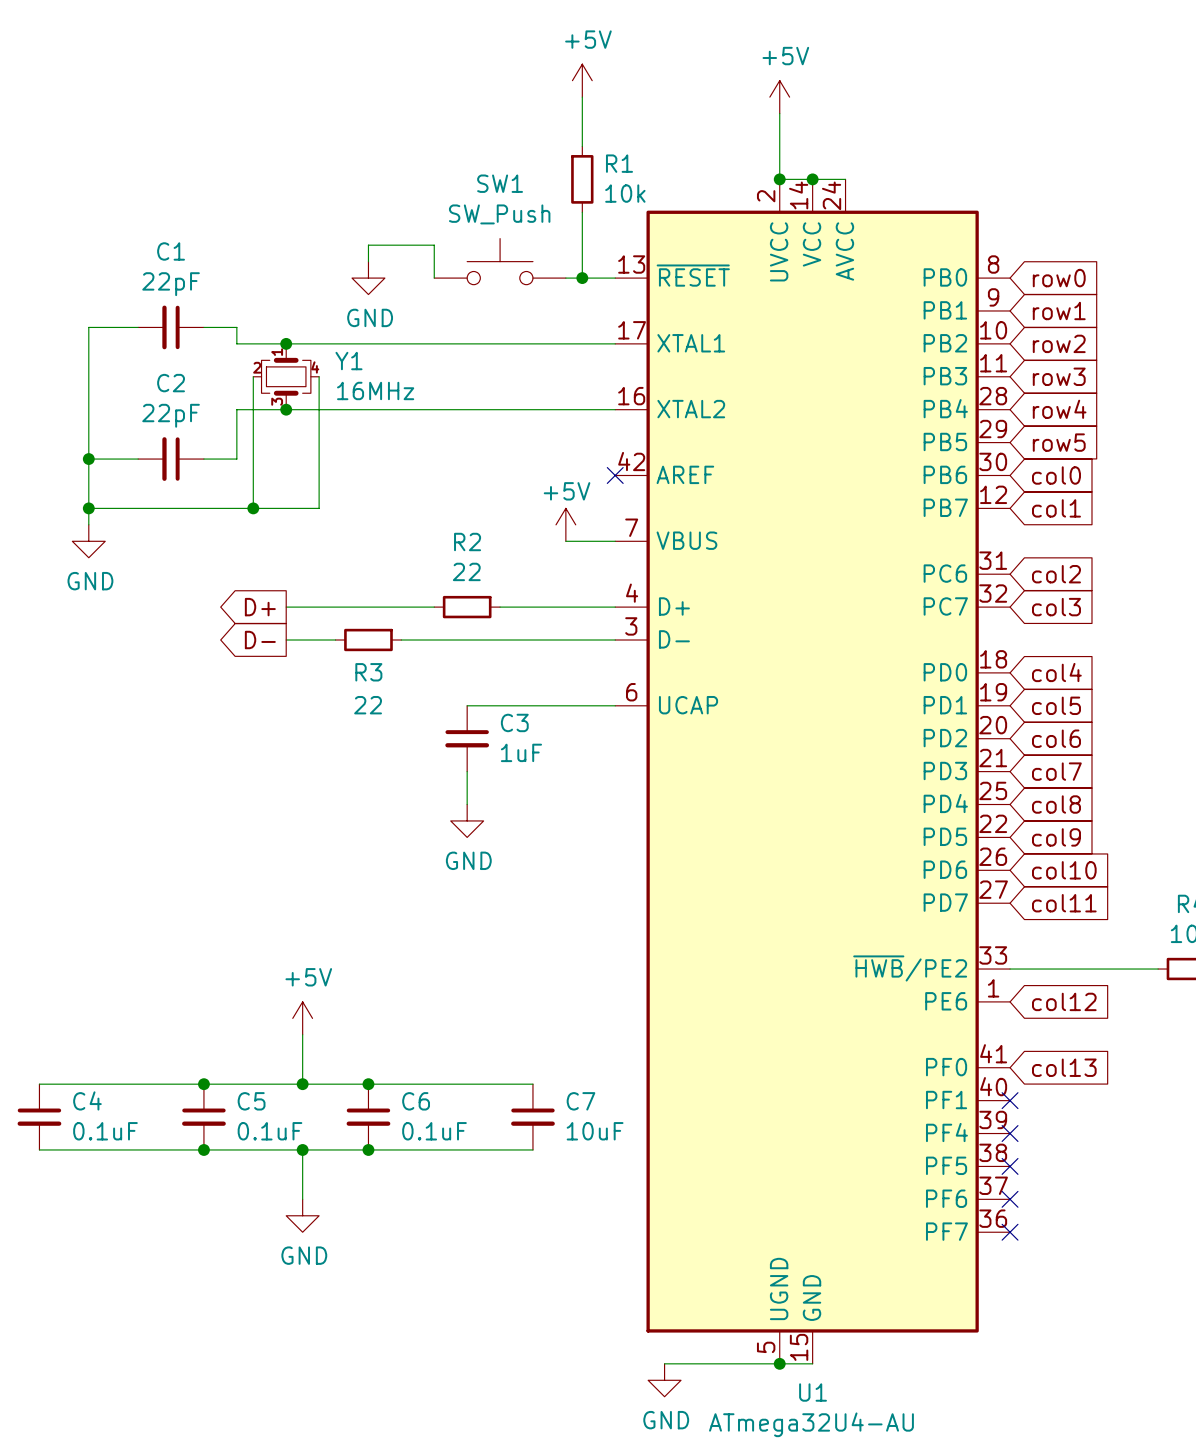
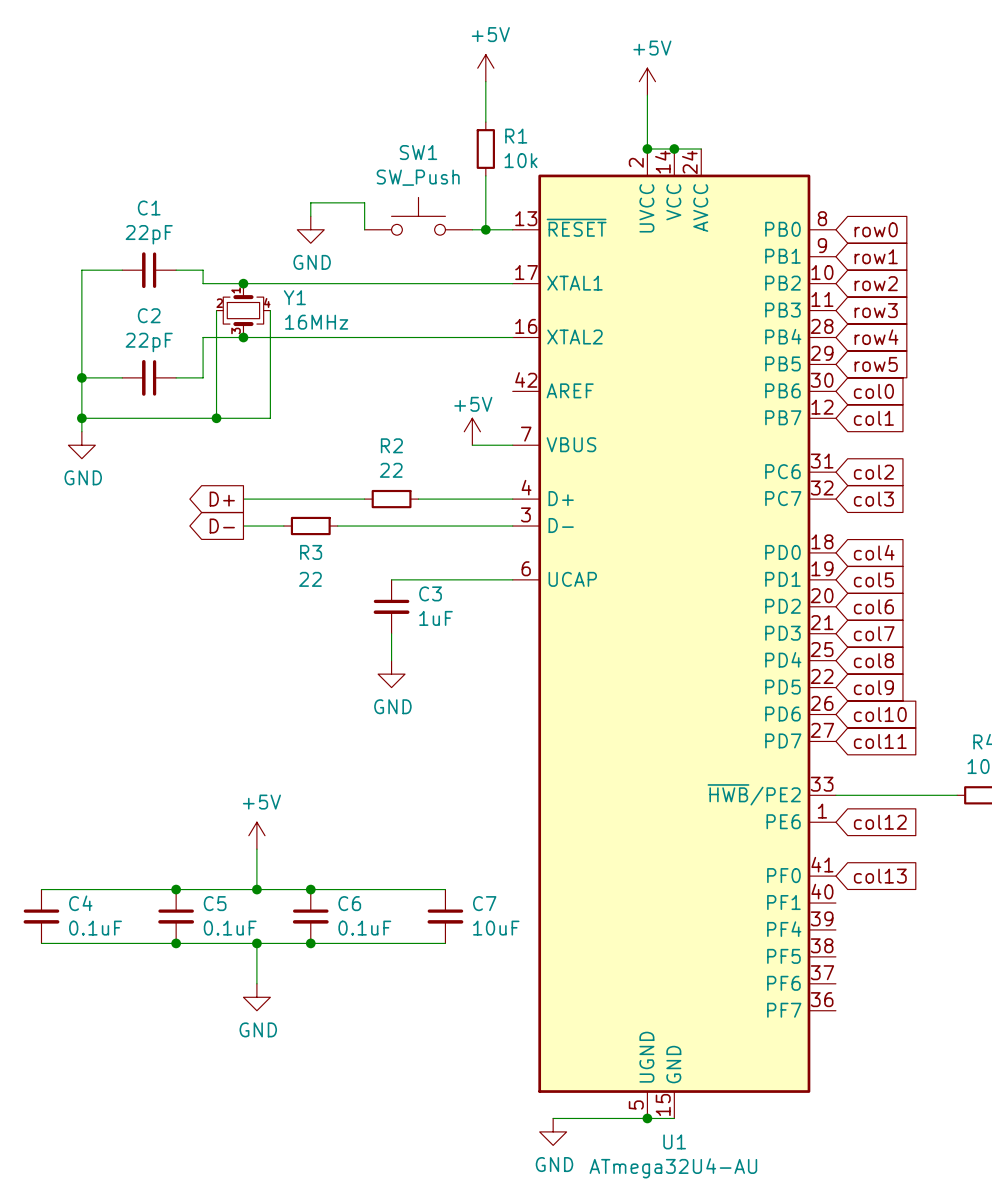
no-connect mark: (615, 475) -> none
no-connect mark: (1010, 1100) -> none
no-connect mark: (1010, 1133) -> none
no-connect mark: (1010, 1166) -> none
no-connect mark: (1010, 1199) -> none
no-connect mark: (1010, 1232) -> none

